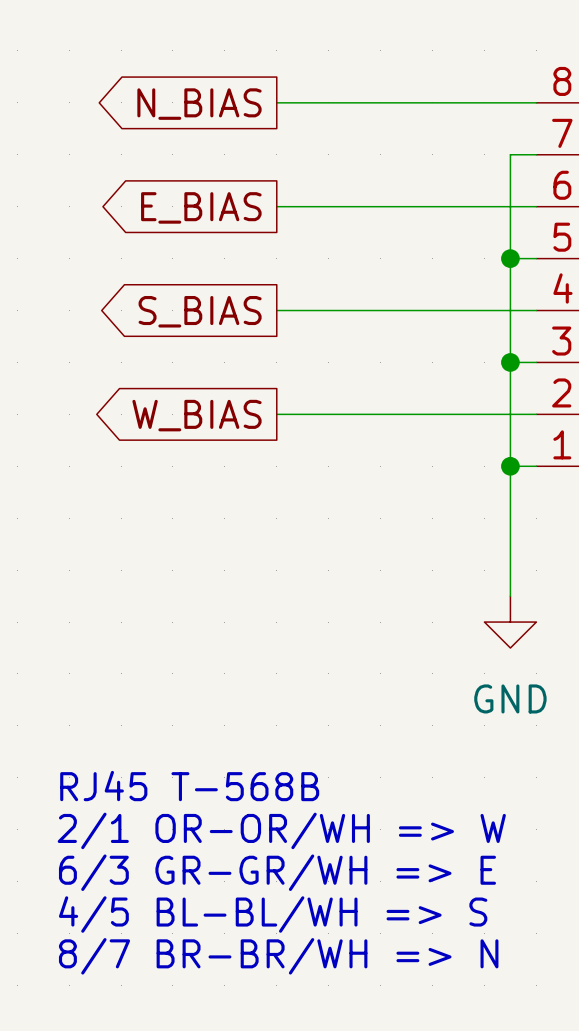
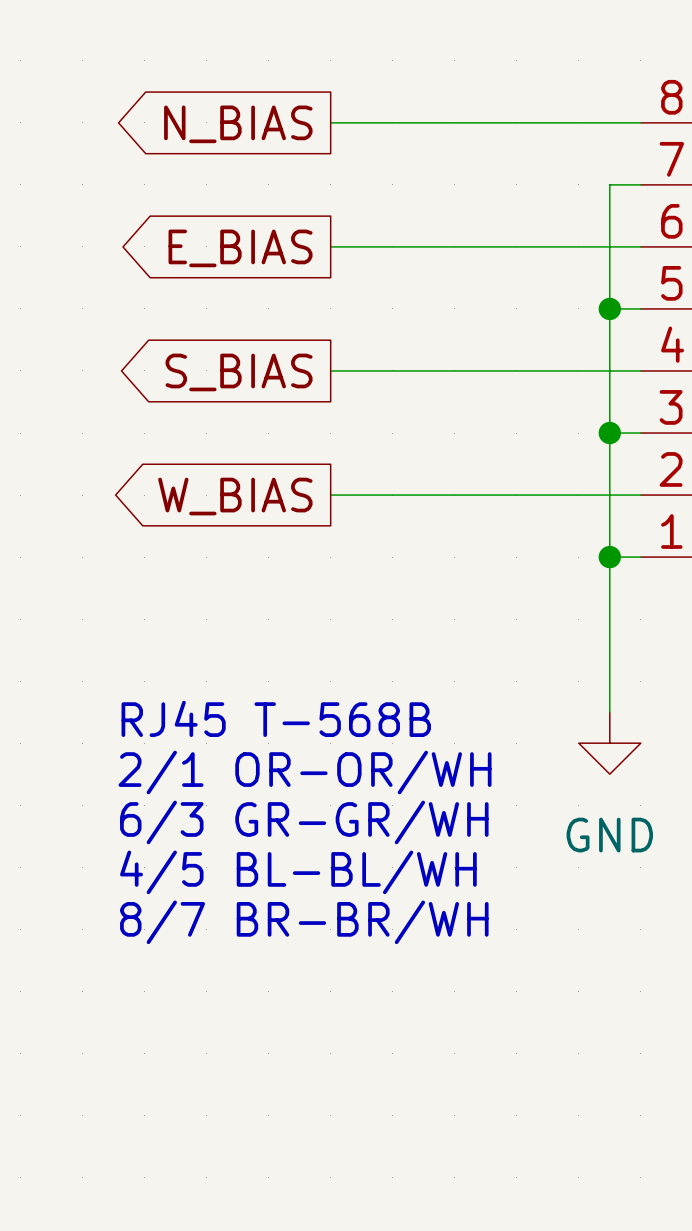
text: none -> 2/1 OR-OR/WH (305, 772)
text: none -> 6/3 GR-GR/WH (304, 822)
text: none -> 4/5 BL-BL/WH (298, 872)
text: none -> 8/7 BR-BR/WH (304, 922)
text position: RJ45 T-568B (189, 786) -> RJ45 T-568B (276, 718)
text: 2/1 OR-OR/WH => W (281, 830) -> none
text: 6/3 GR-GR/WH => E (277, 872) -> none
text: 4/5 BL-BL/WH => S (273, 914) -> none
text: 8/7 BR-BR/WH => N (278, 956) -> none

